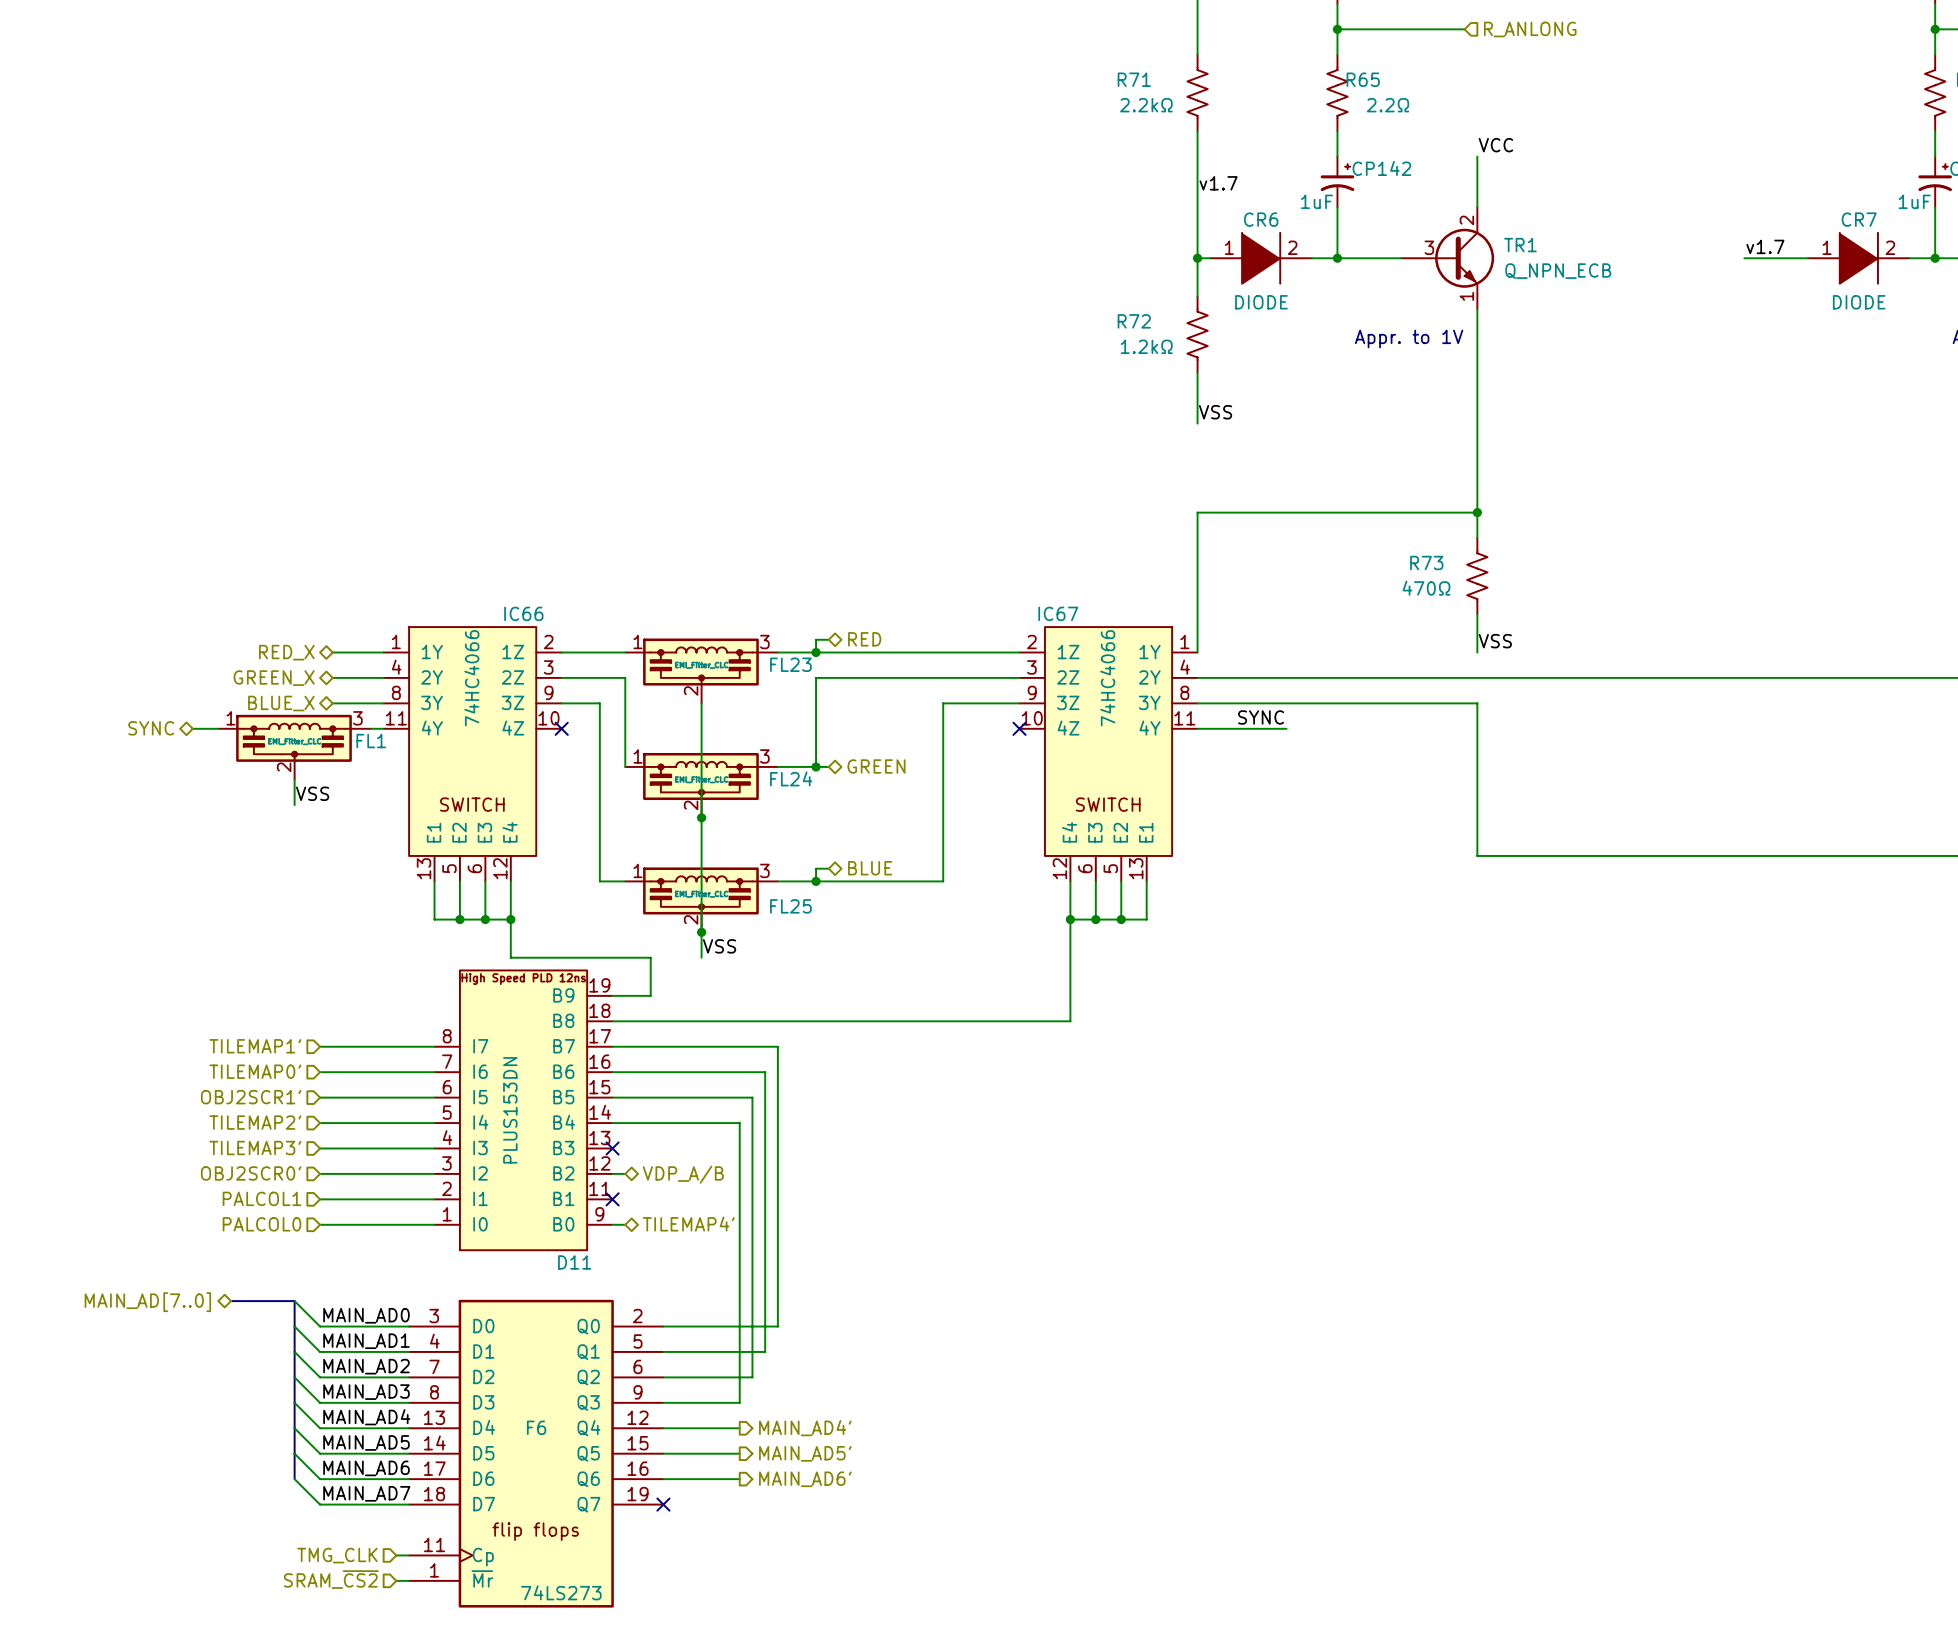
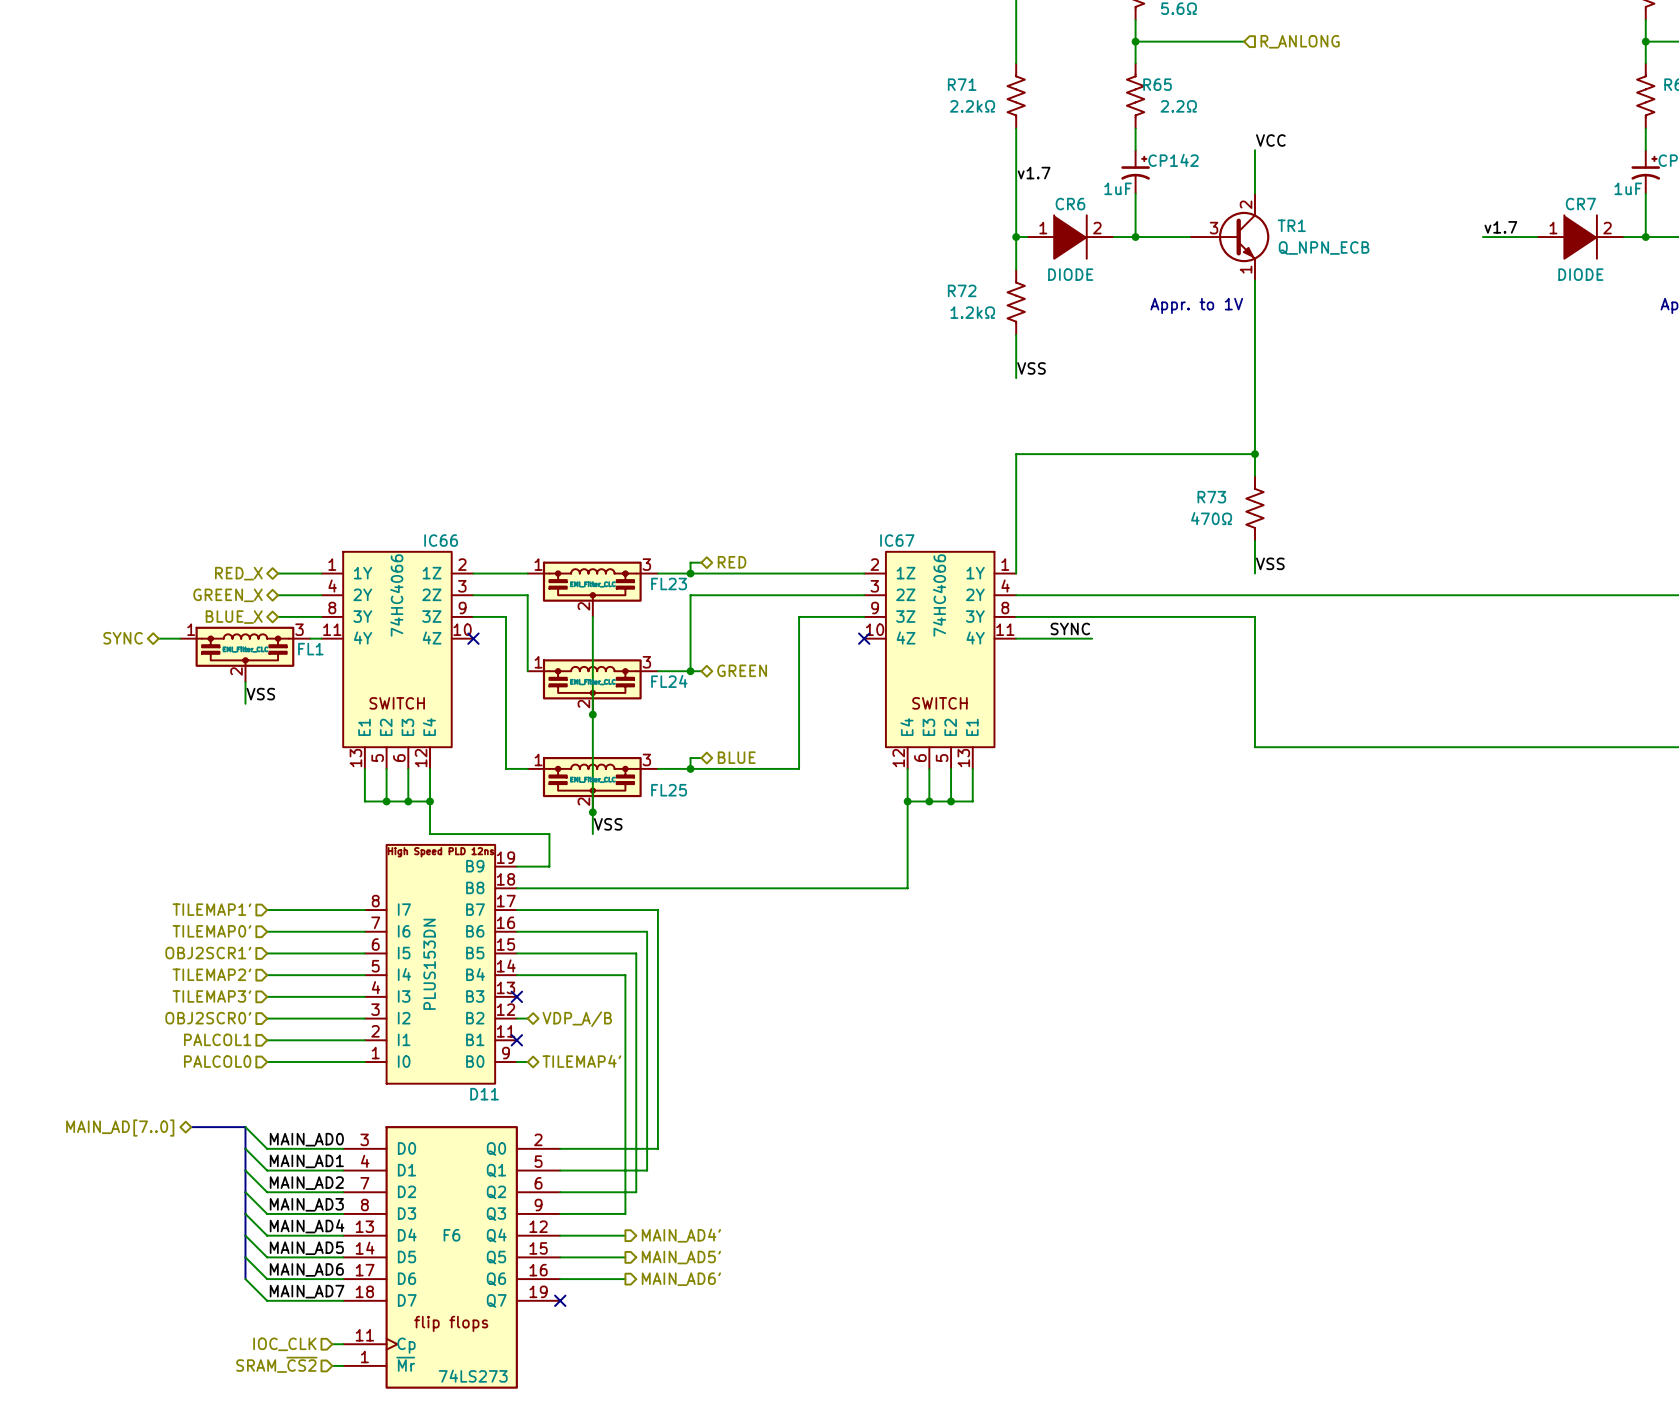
hierarchical label: TMG_CLK (337, 1555) -> IOC_CLK (284, 1344)

